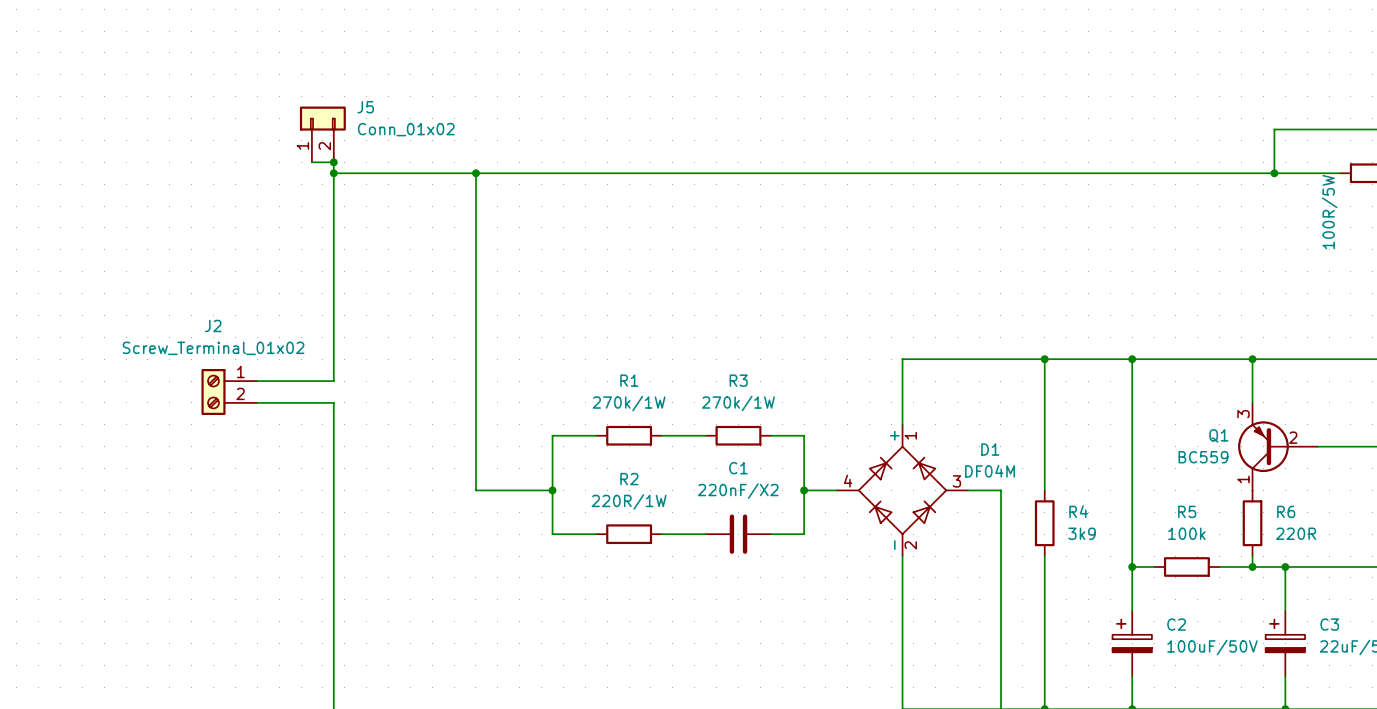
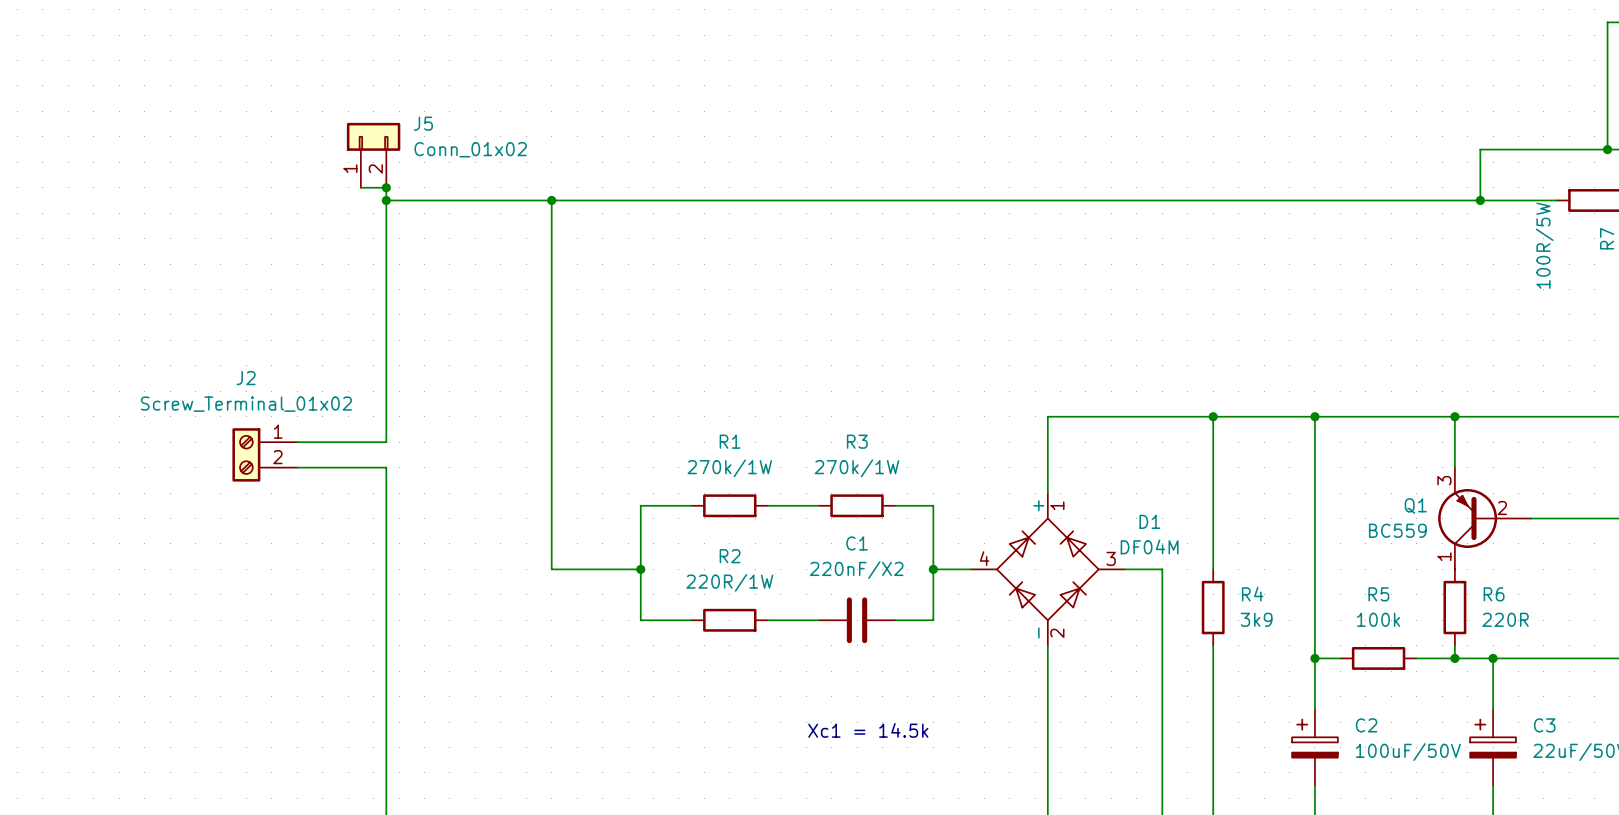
text: none -> Xc1 = 14.5k (868, 730)

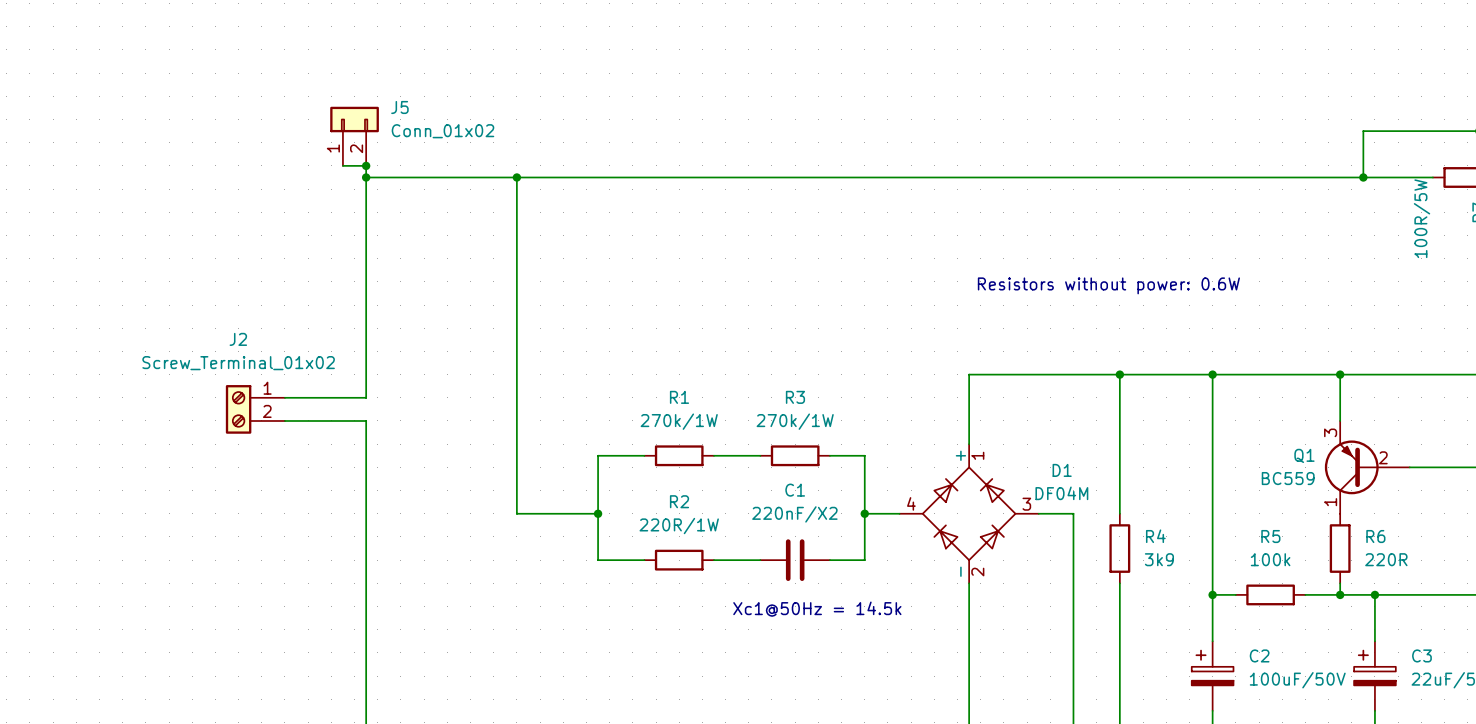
text: none -> Resistors without power: 0.6W (1108, 285)
text: none -> Xc1@50Hz = 14.5k (817, 609)
text: Xc1 = 14.5k (868, 730) -> none

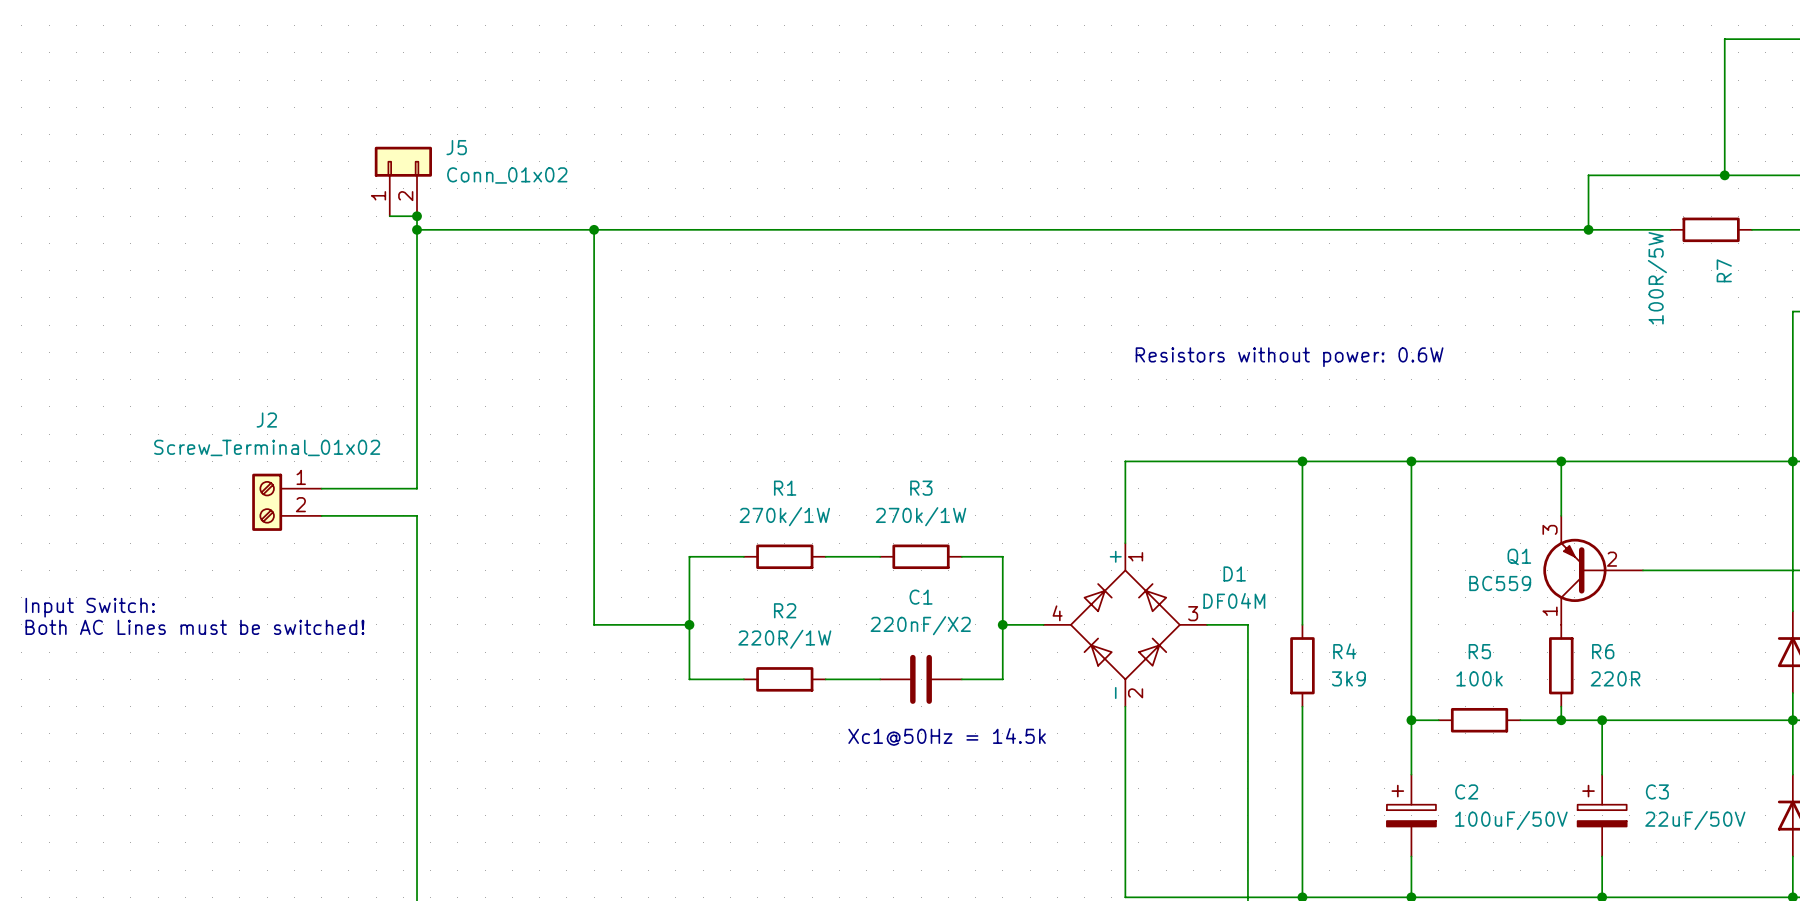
text: none -> Input Switch: (90, 607)
text: none -> Both AC Lines must be switched! (194, 627)

